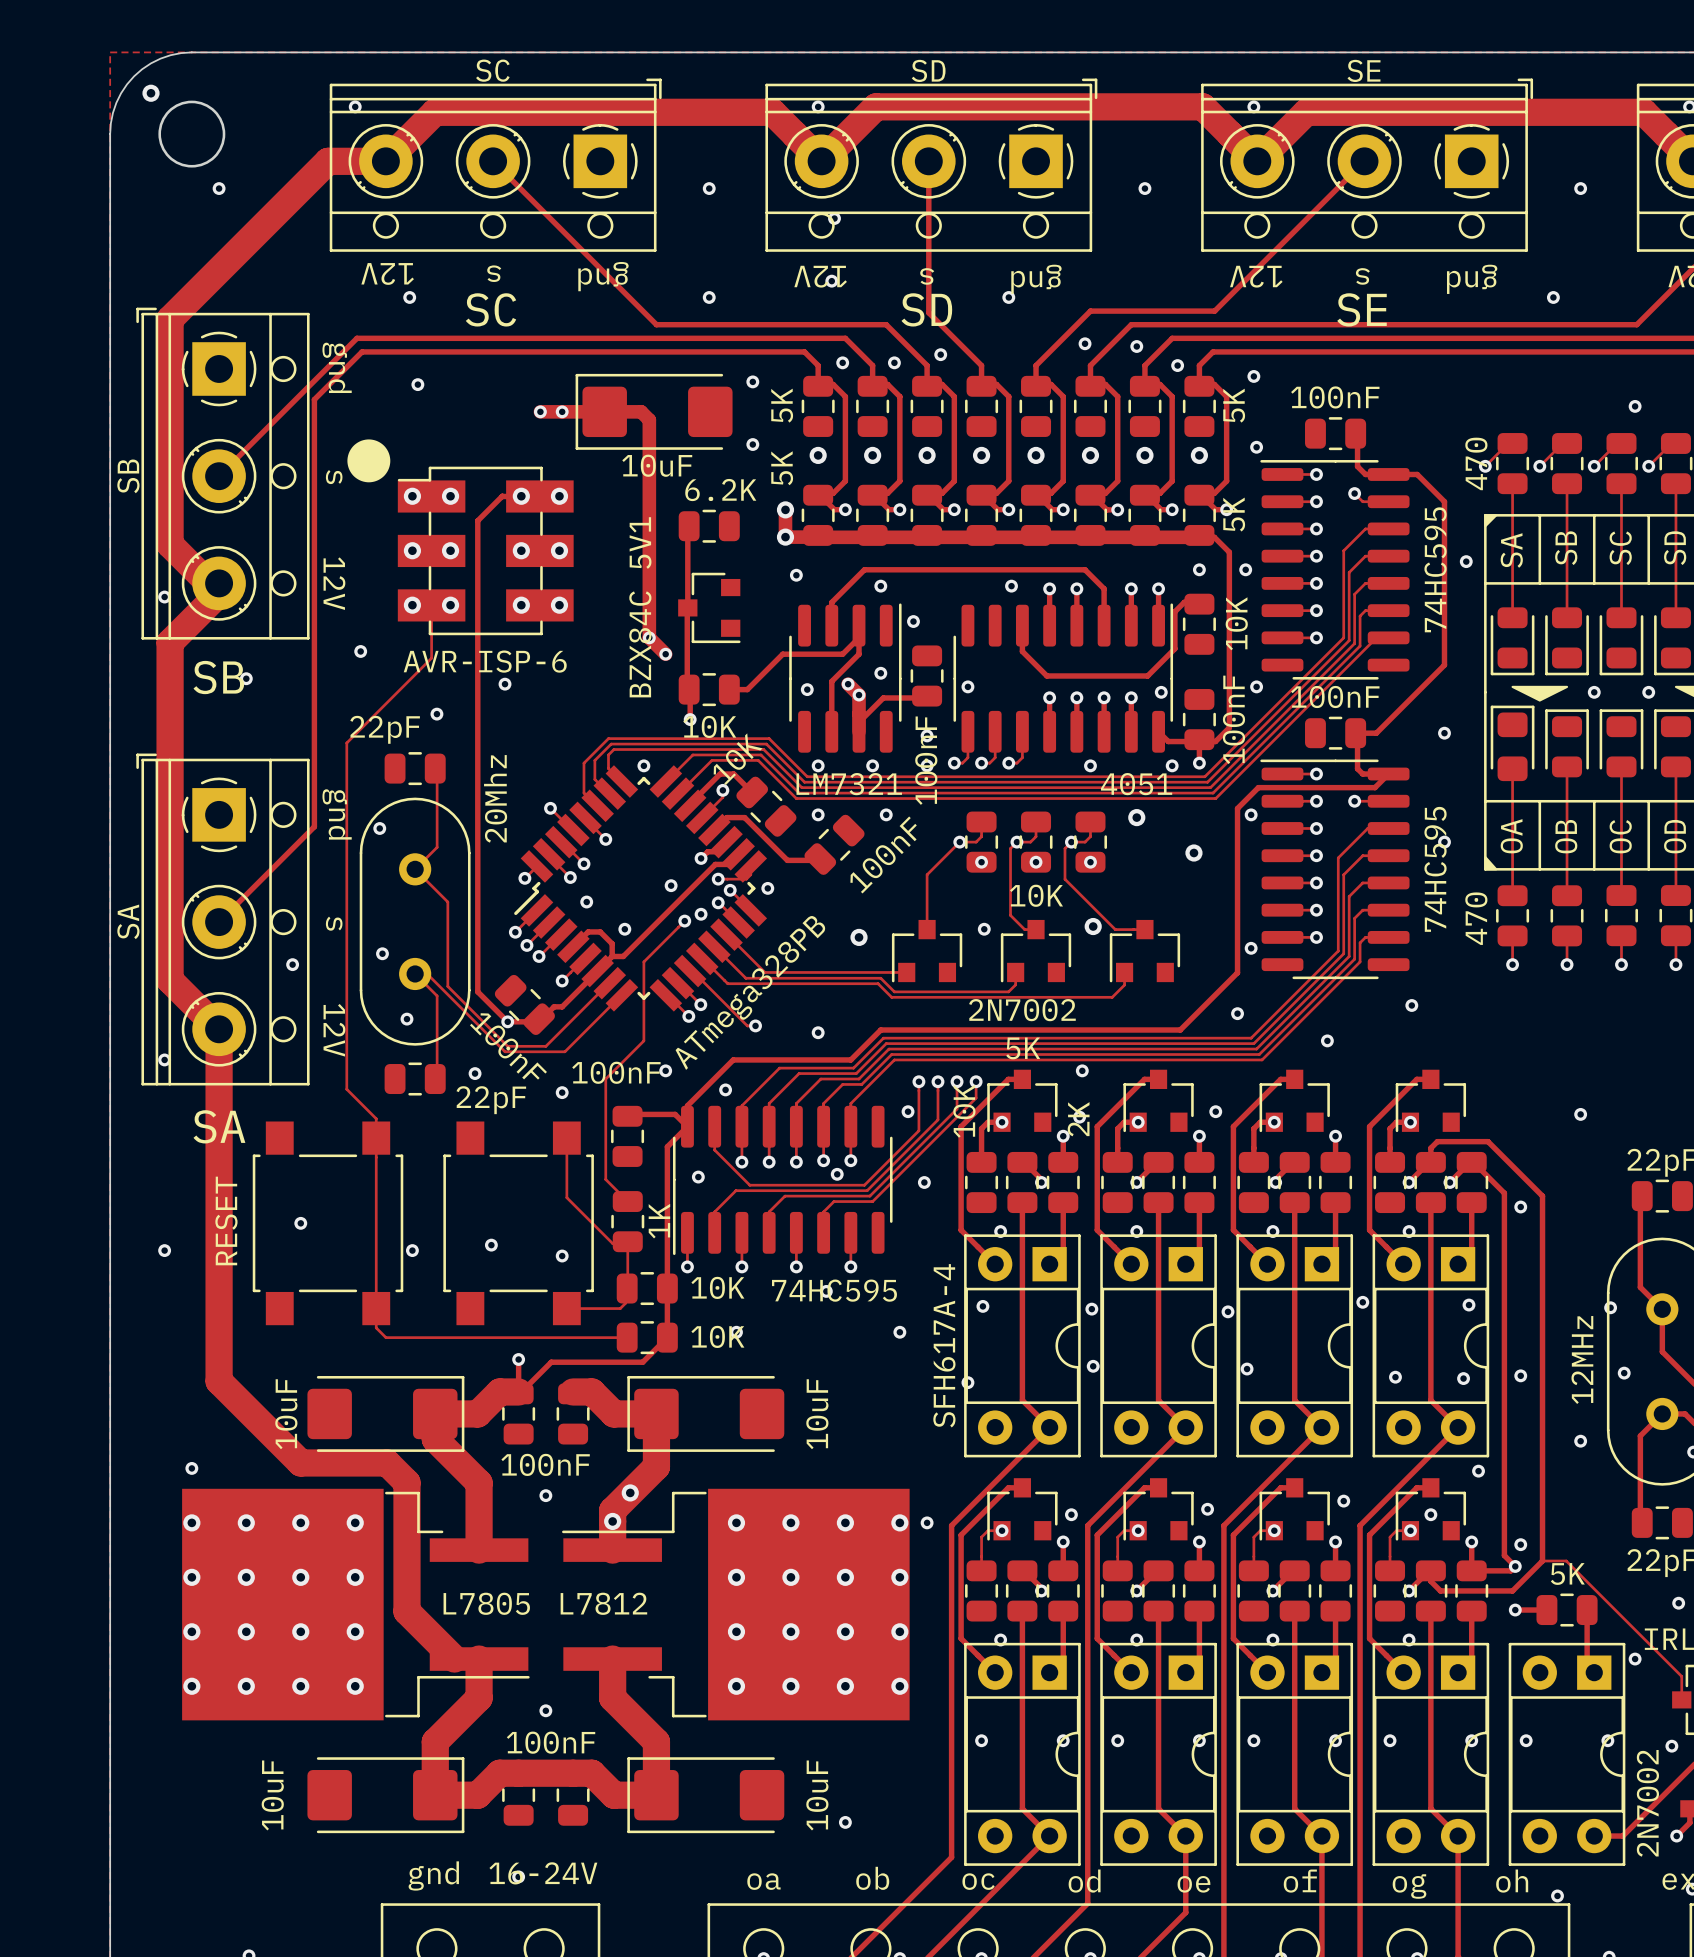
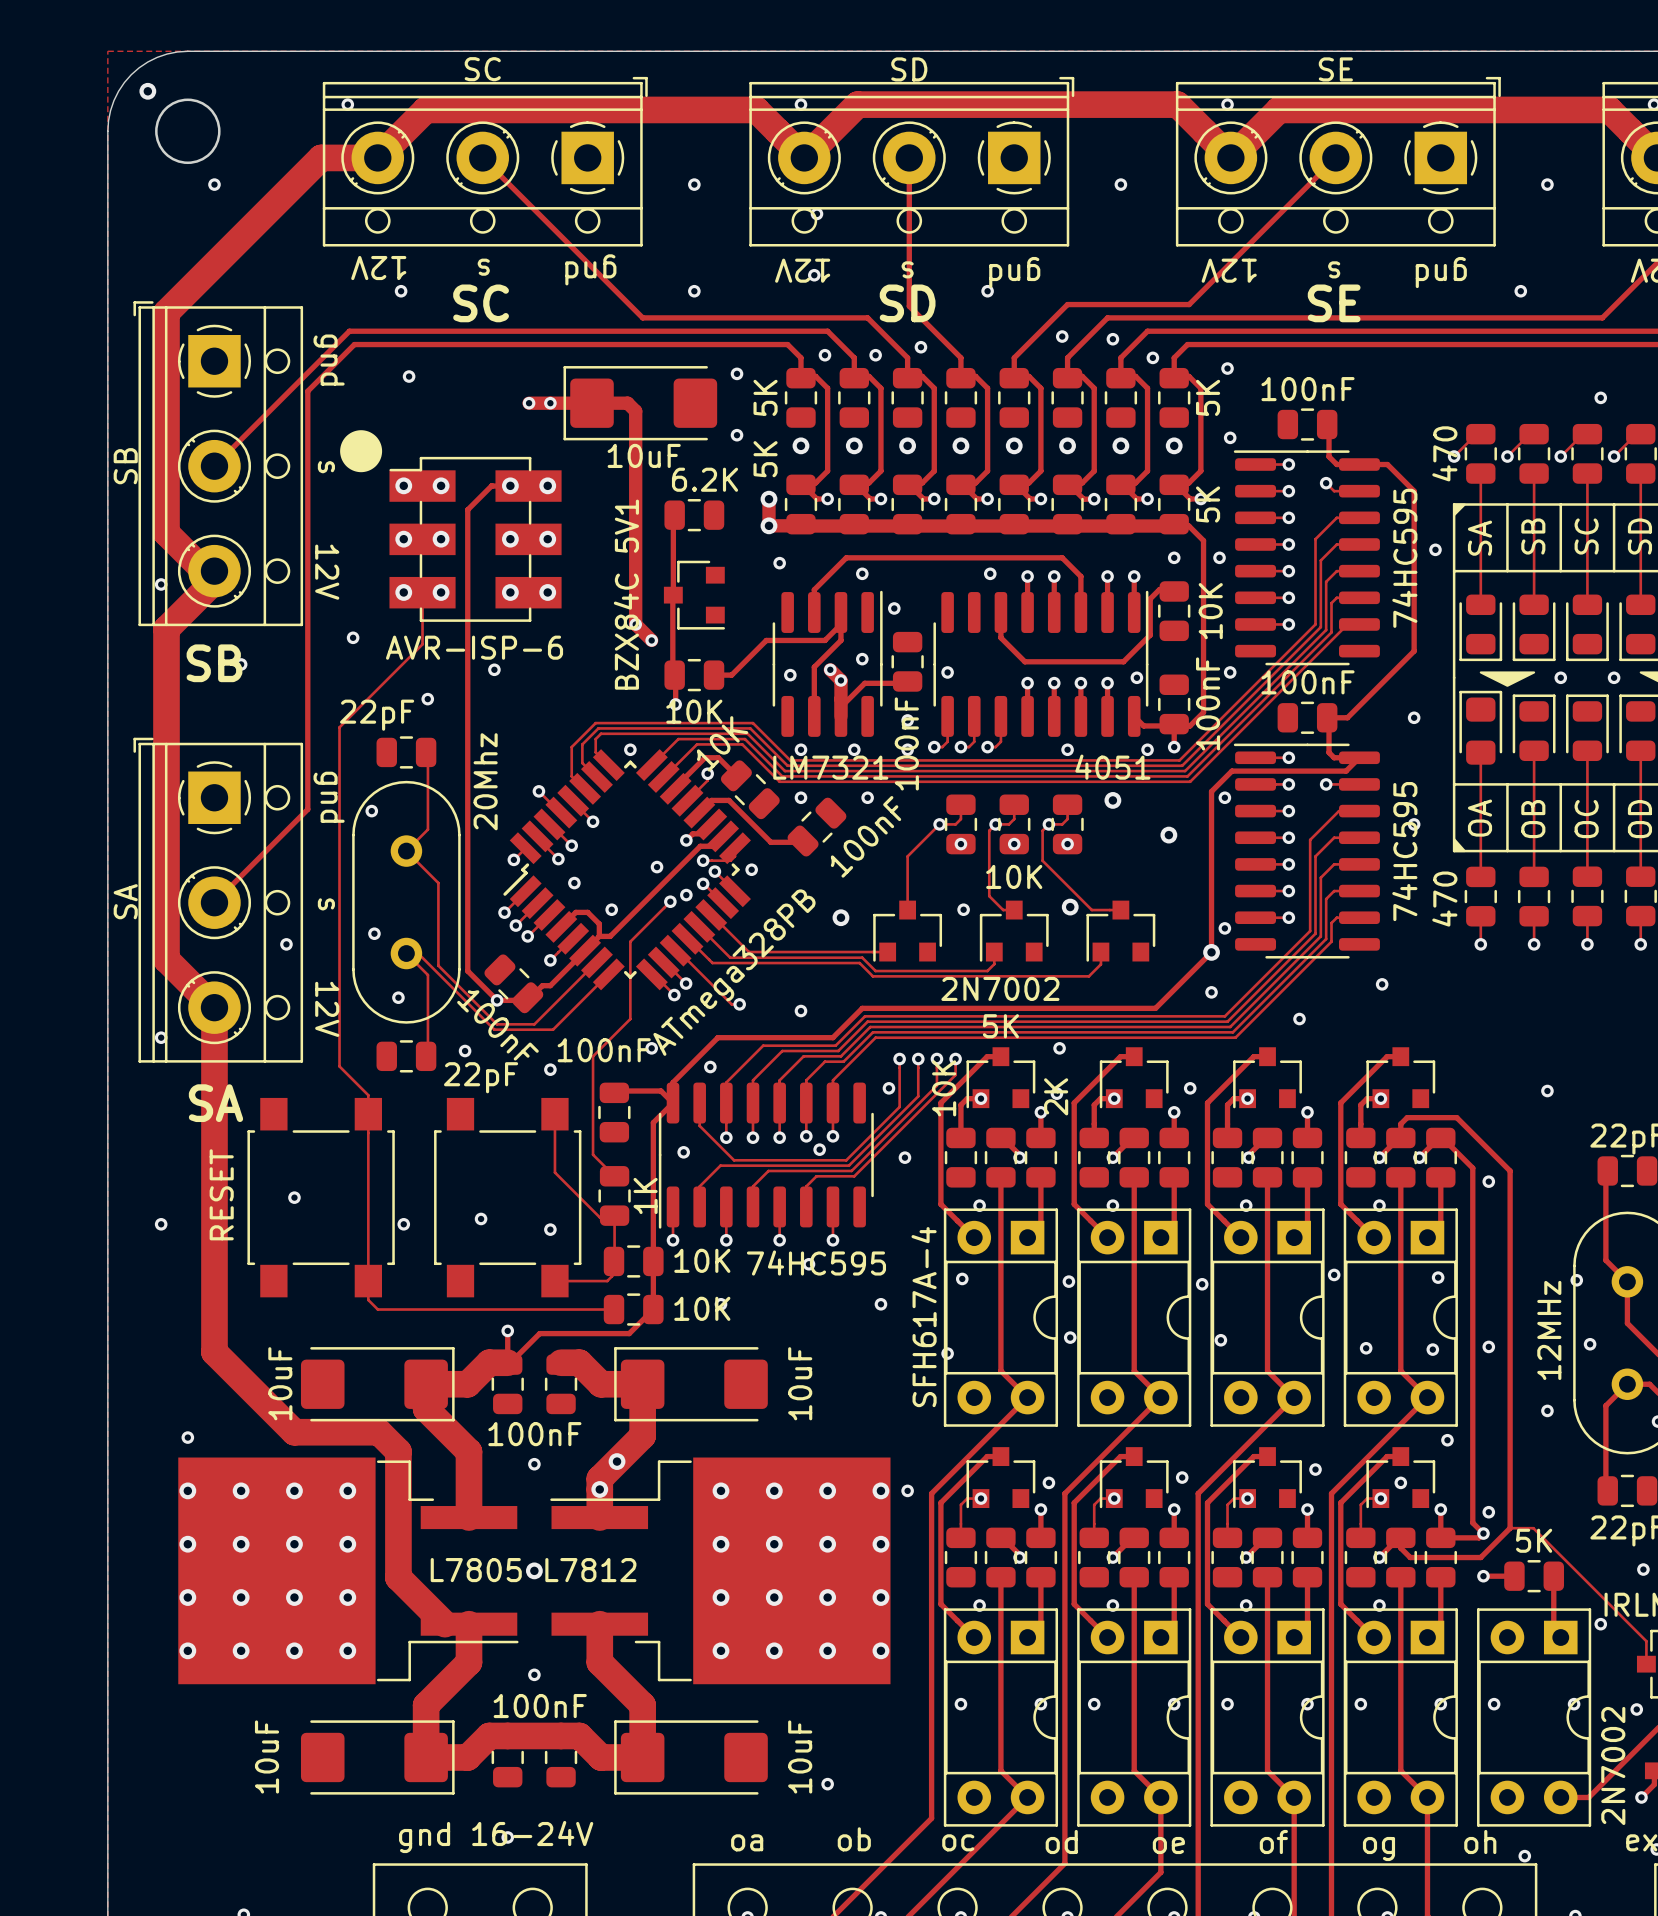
via: none -> (1211, 952)
via: none -> (534, 1570)

